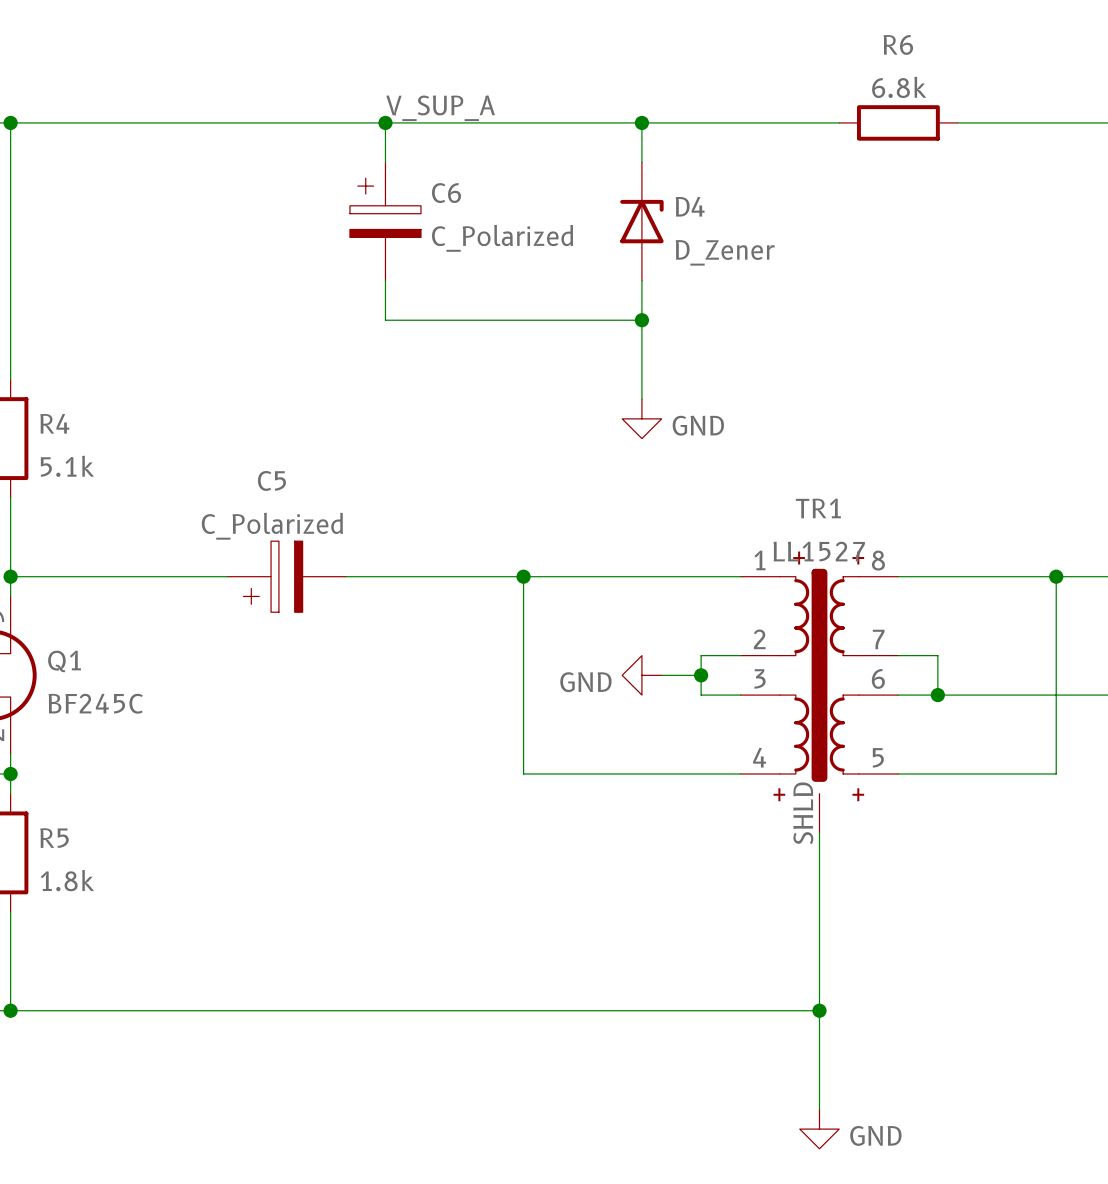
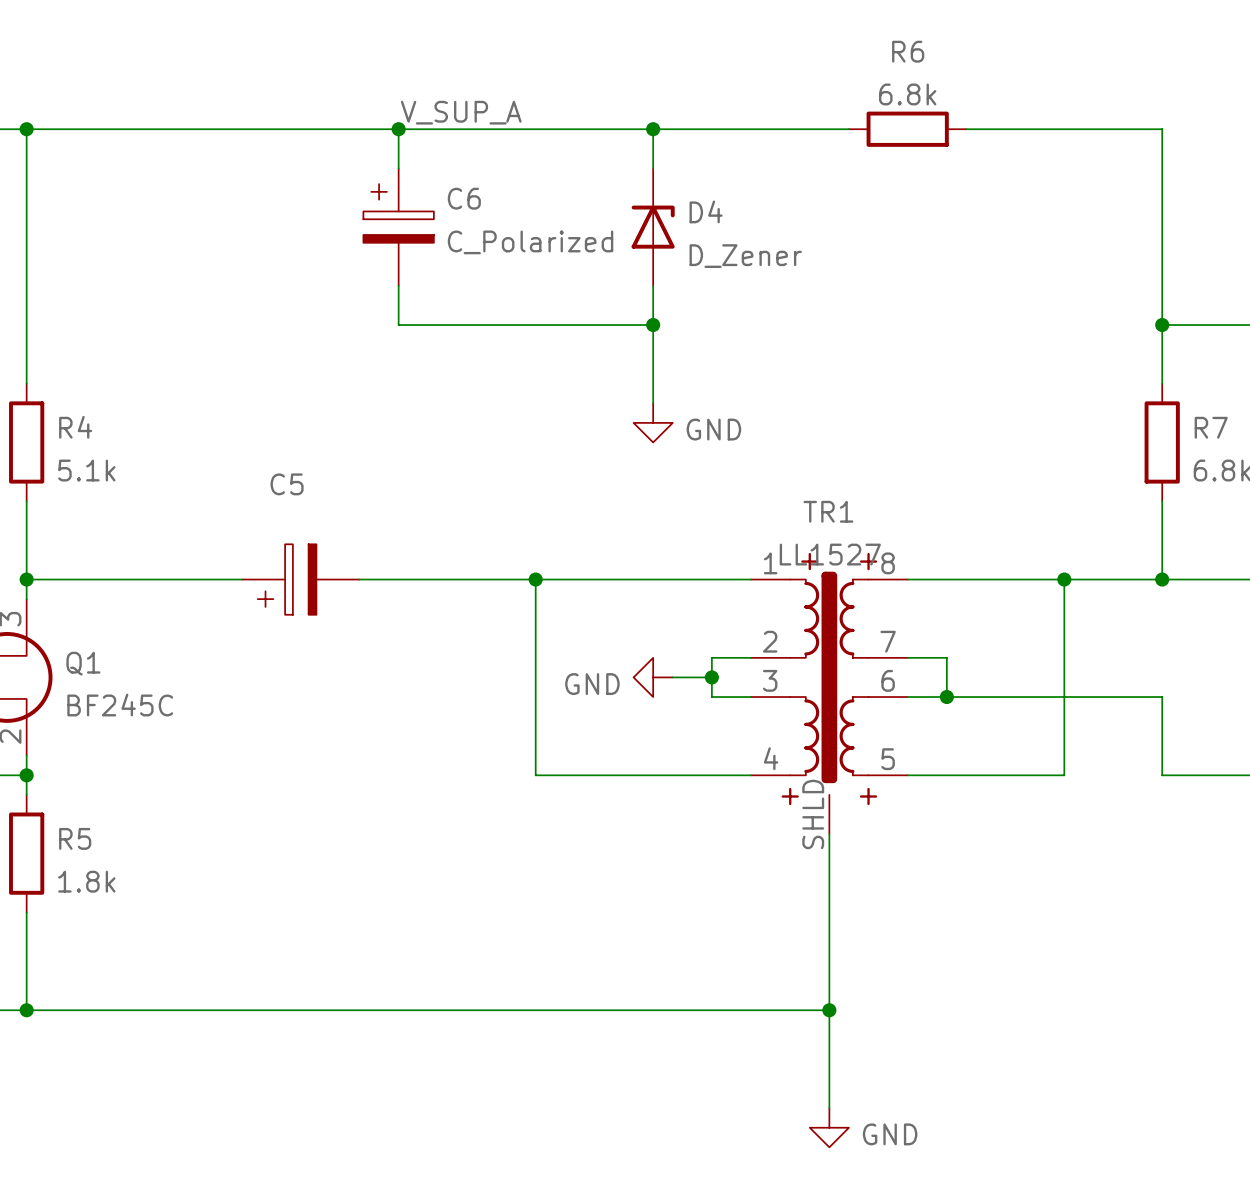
C5 value: C_Polarized (272, 526) -> none

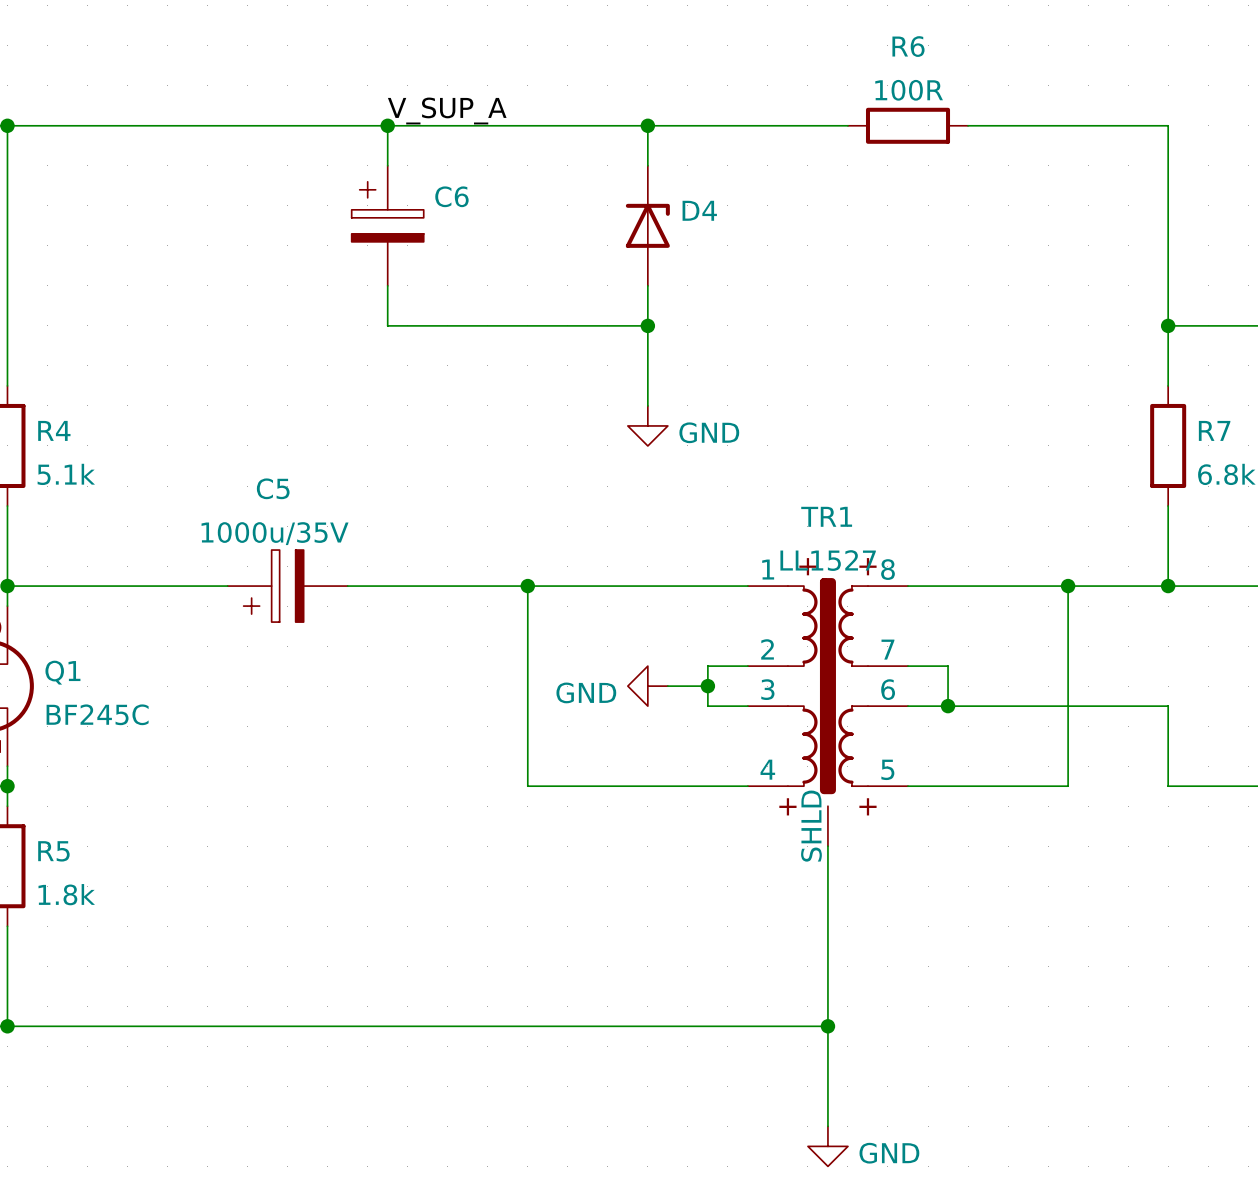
R6 value: 6.8k (907, 94) -> 100R (909, 90)
C6 value: C_Polarized (530, 242) -> none
D4 value: D_Zener (745, 256) -> none
C5 value: none -> 1000u/35V (275, 533)

